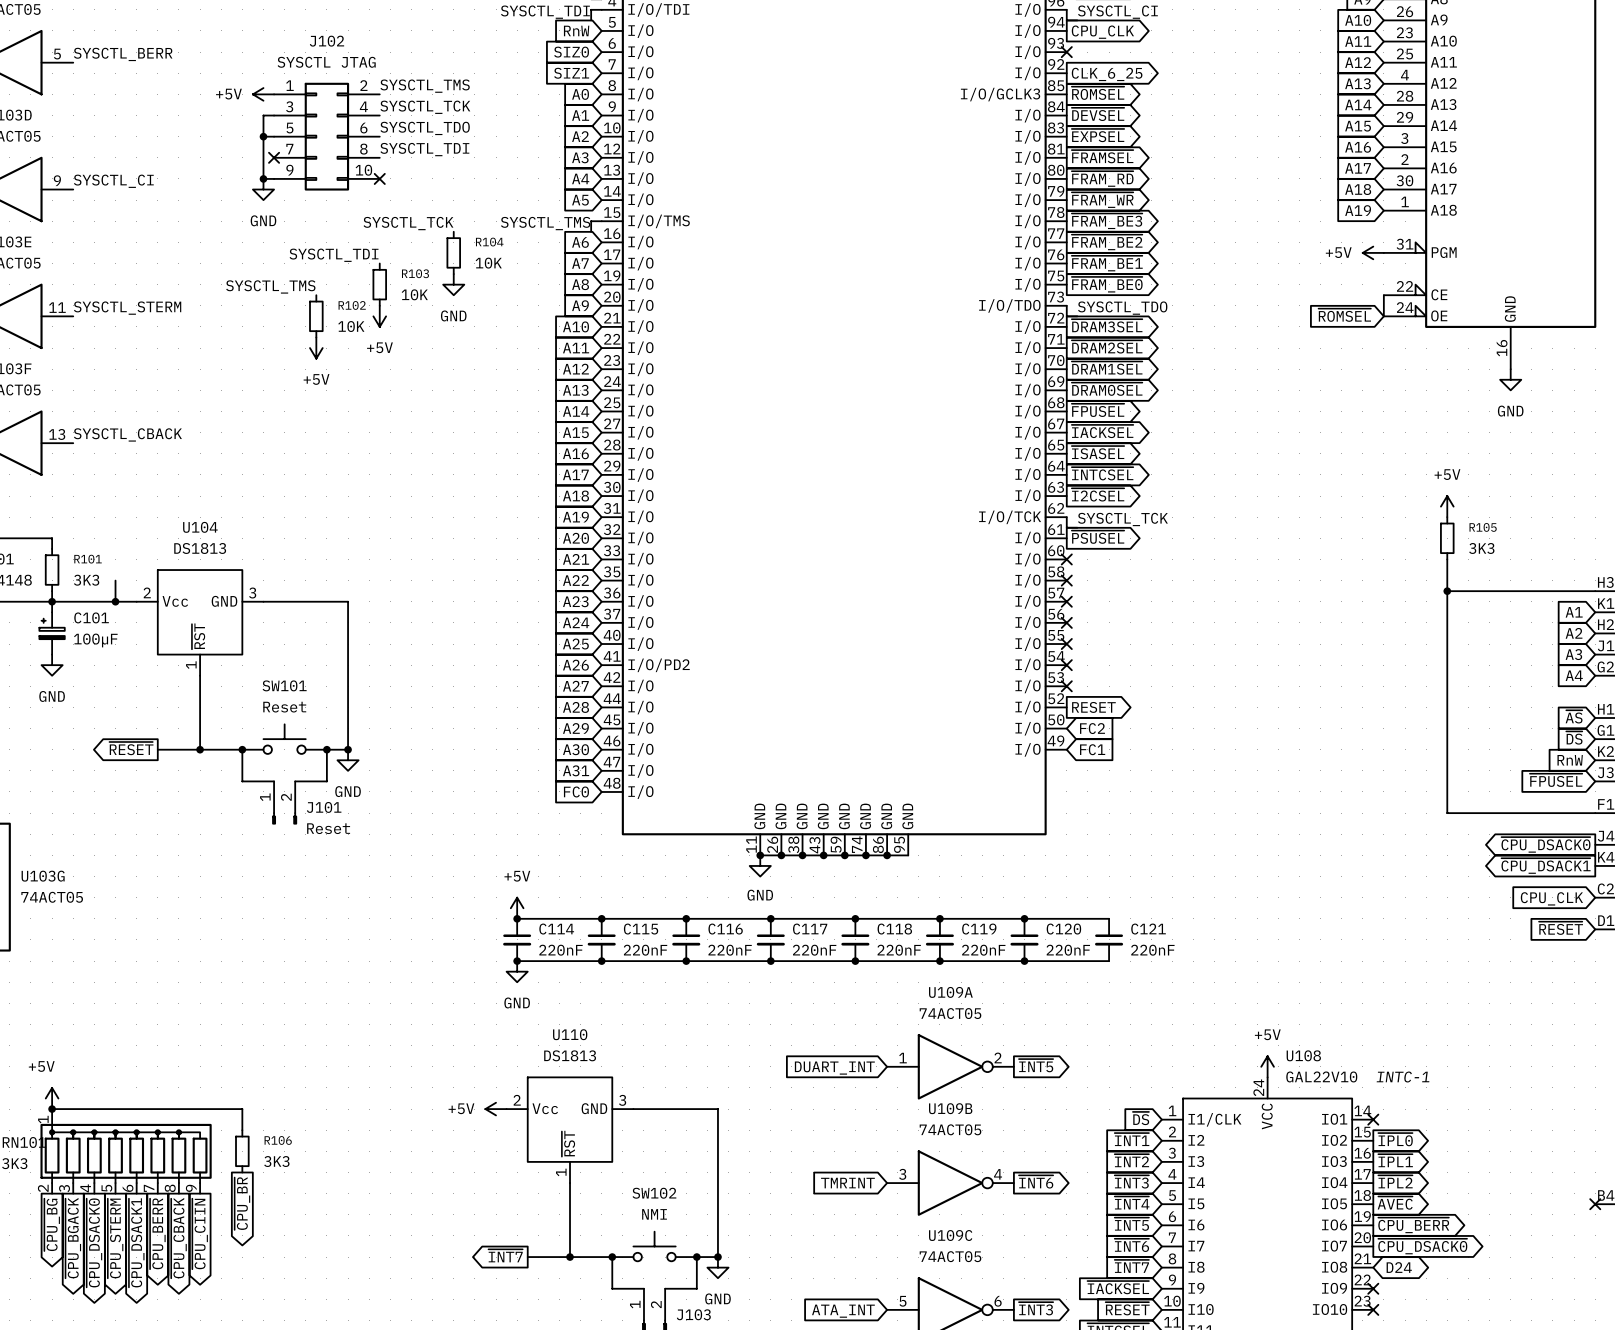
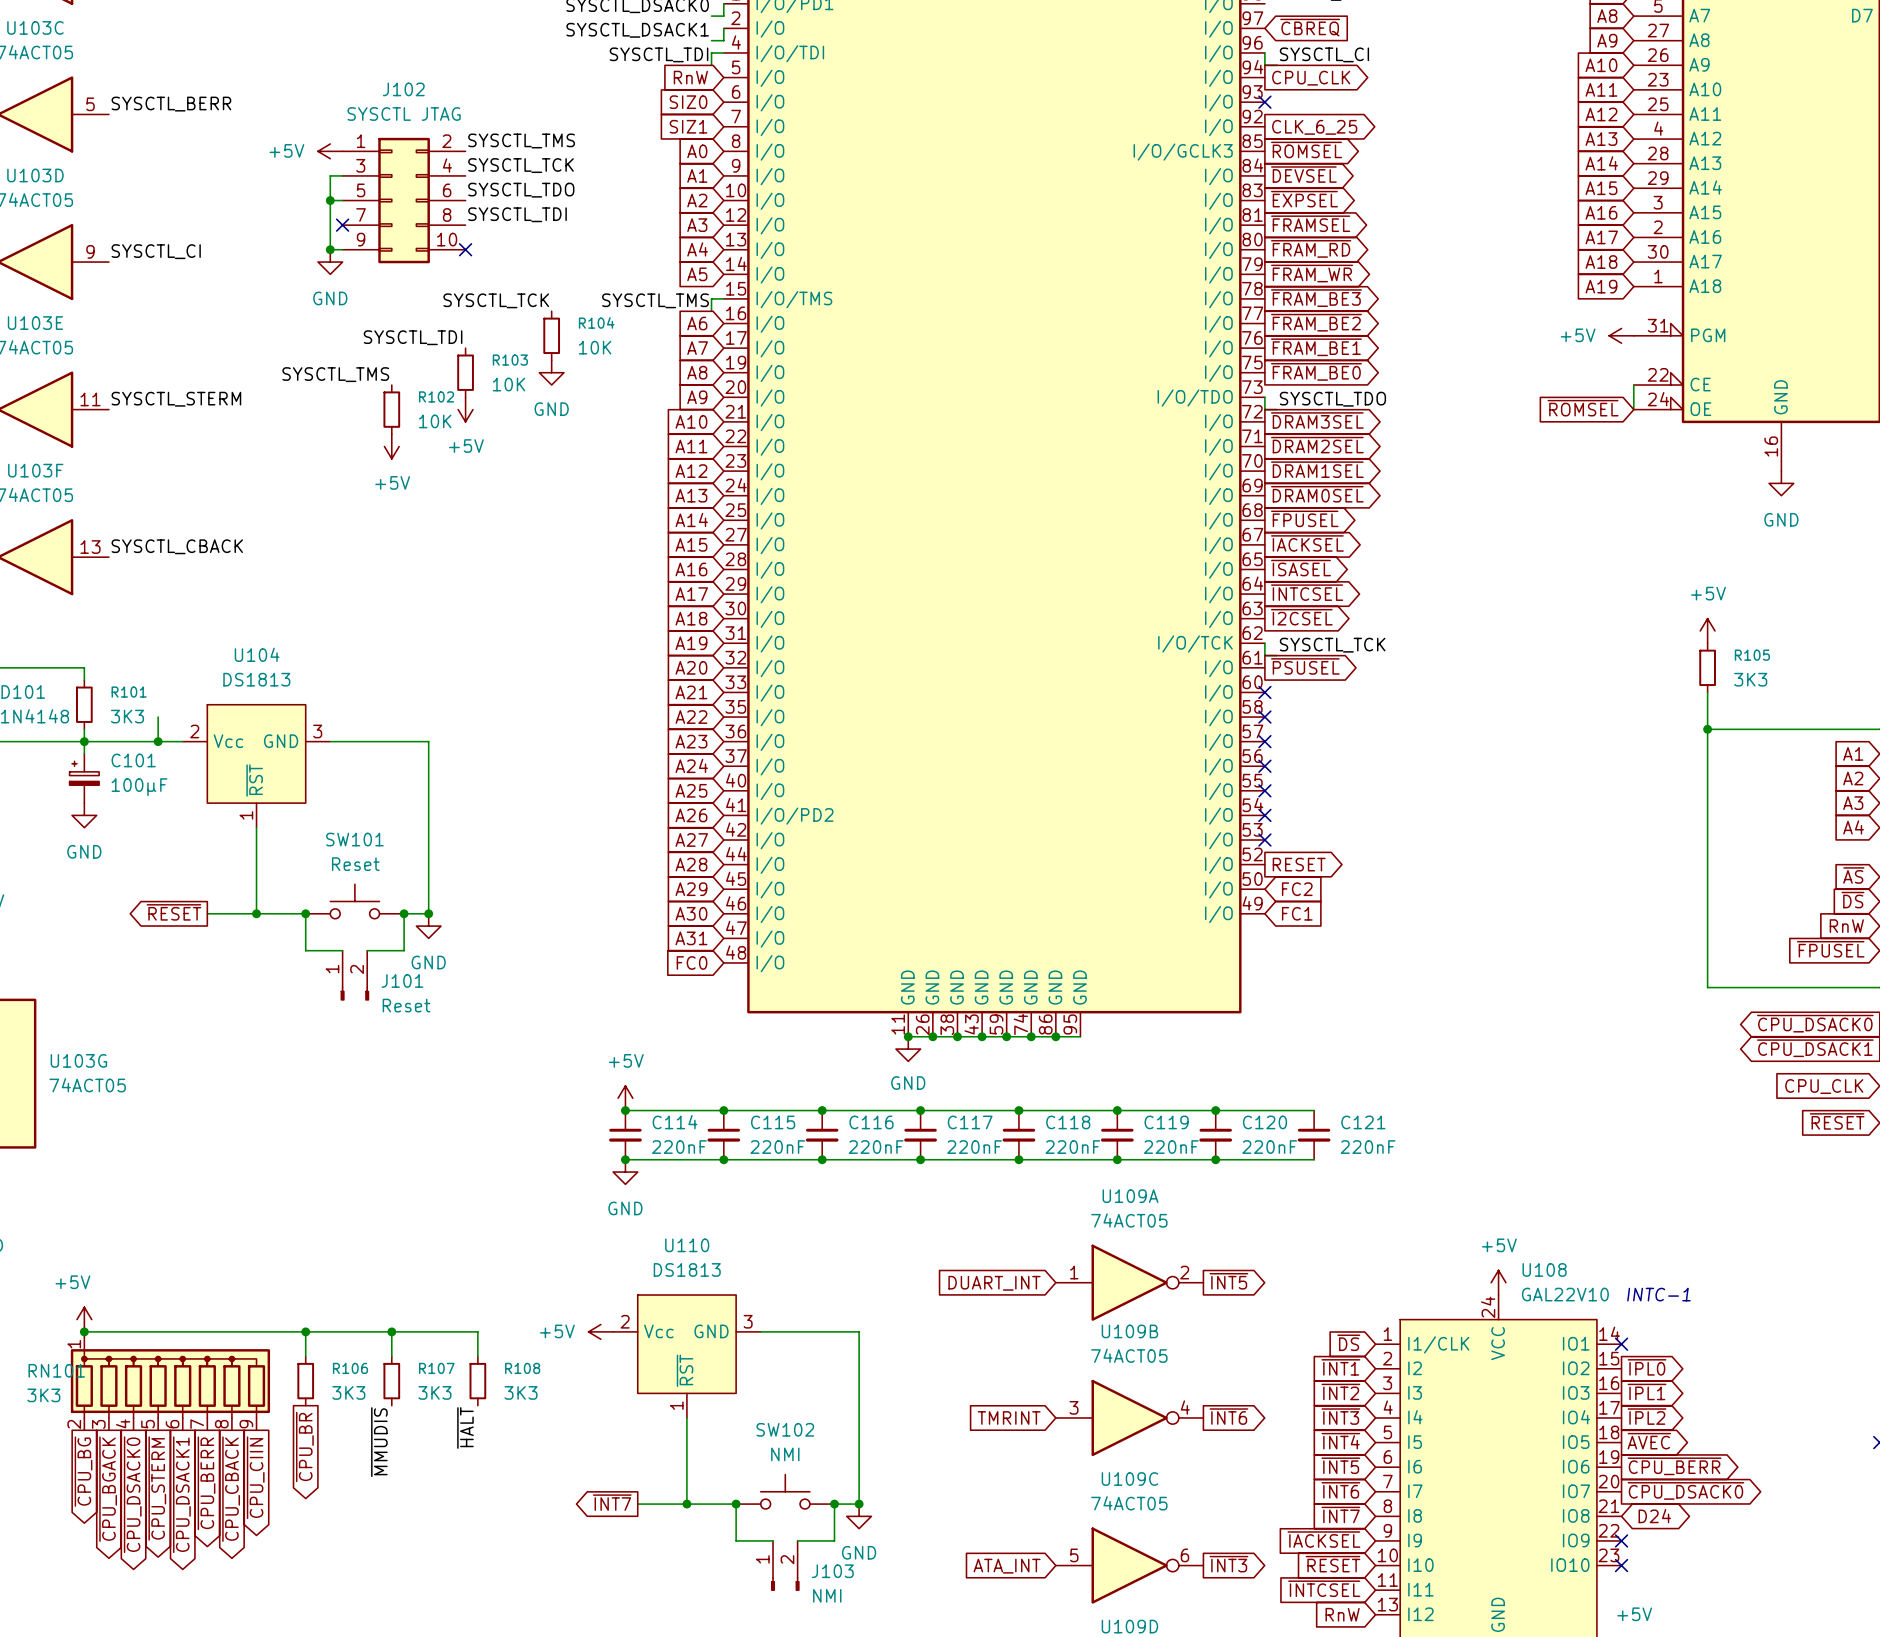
wire: none -> (305, 1331) (477, 1331) (477, 1356)
junction: none -> (305, 1331)
wire: none -> (391, 1331) (391, 1356)
junction: none -> (391, 1331)
R107: none -> 3K3 (391, 1381)
R108: none -> 3K3 (477, 1381)
label: none -> ~{HALT} (465, 1428)
label: none -> ~{MMUDIS} (379, 1442)

